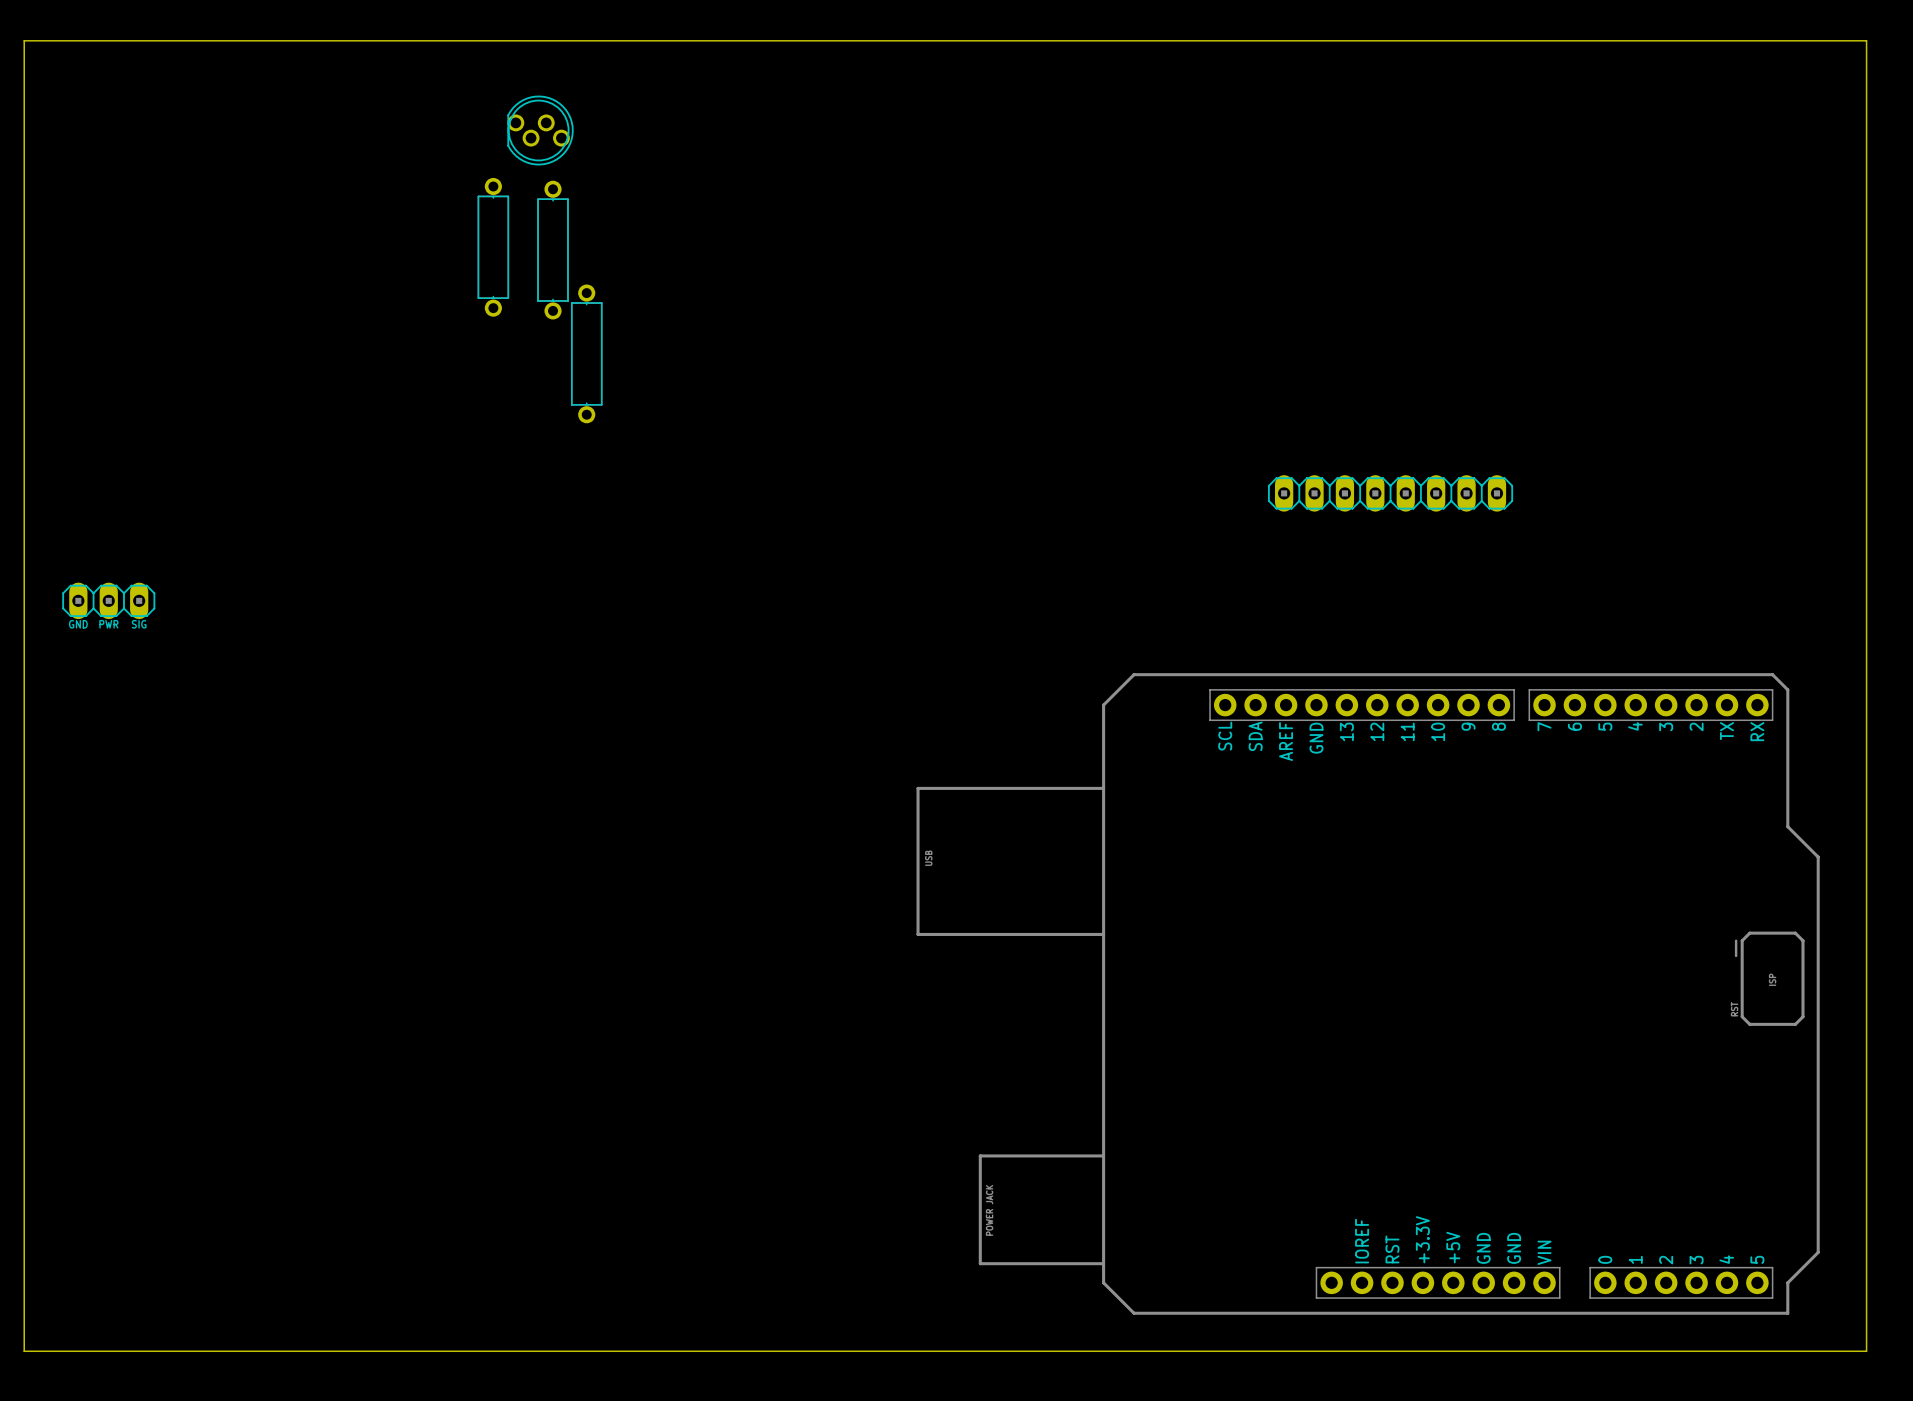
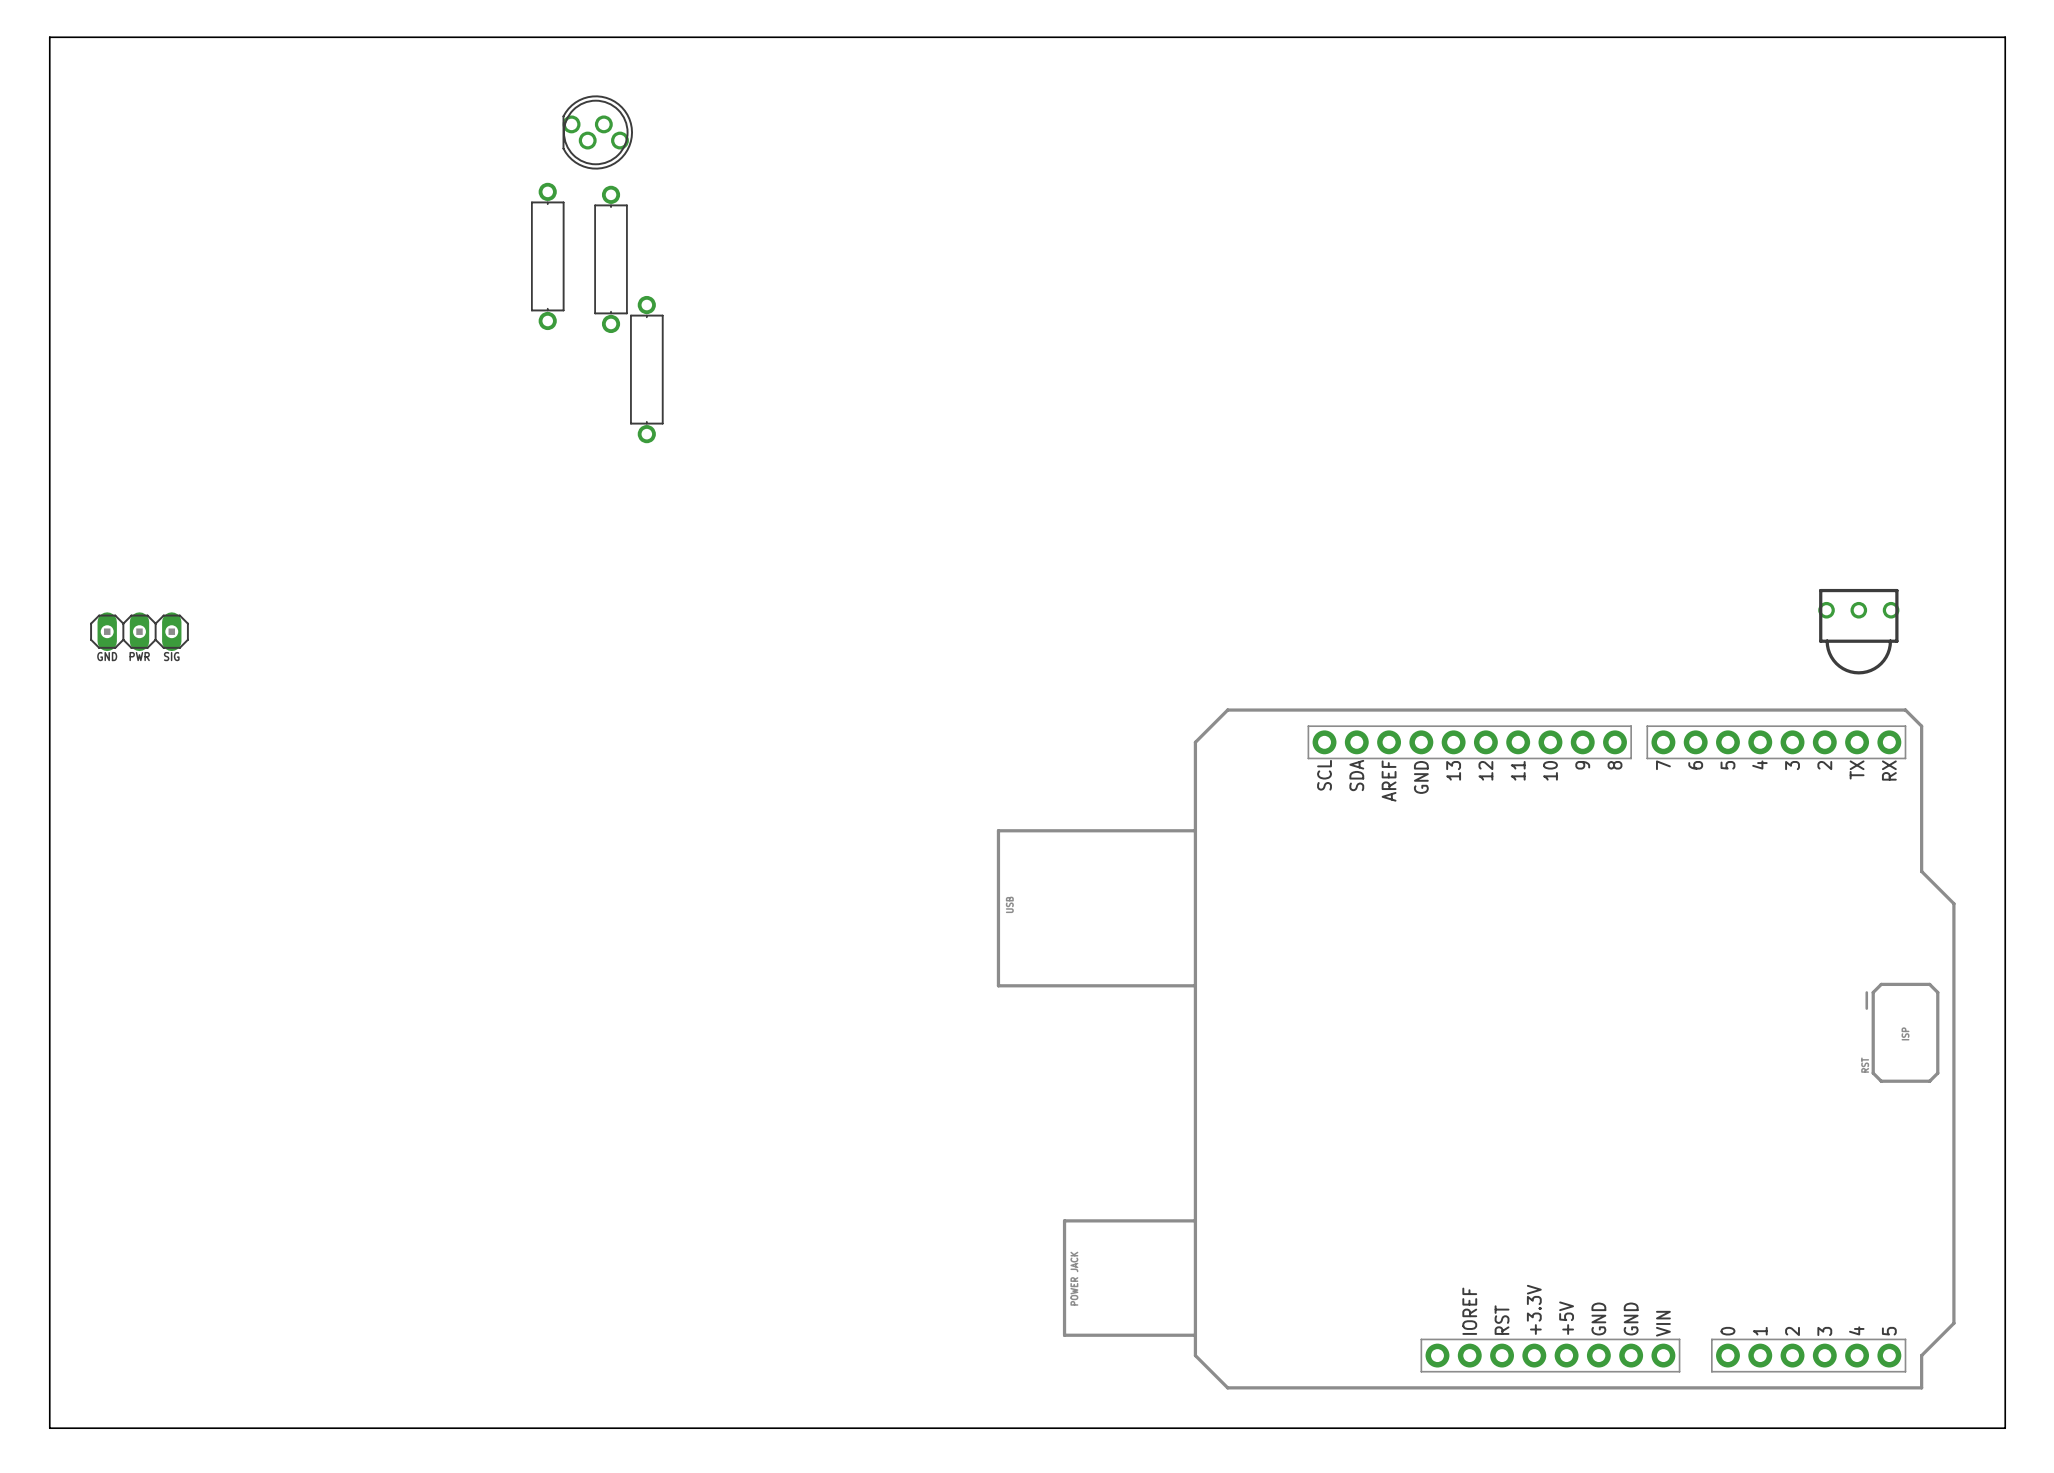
part: (1390, 493) -> none
part: none -> (1858, 631)

